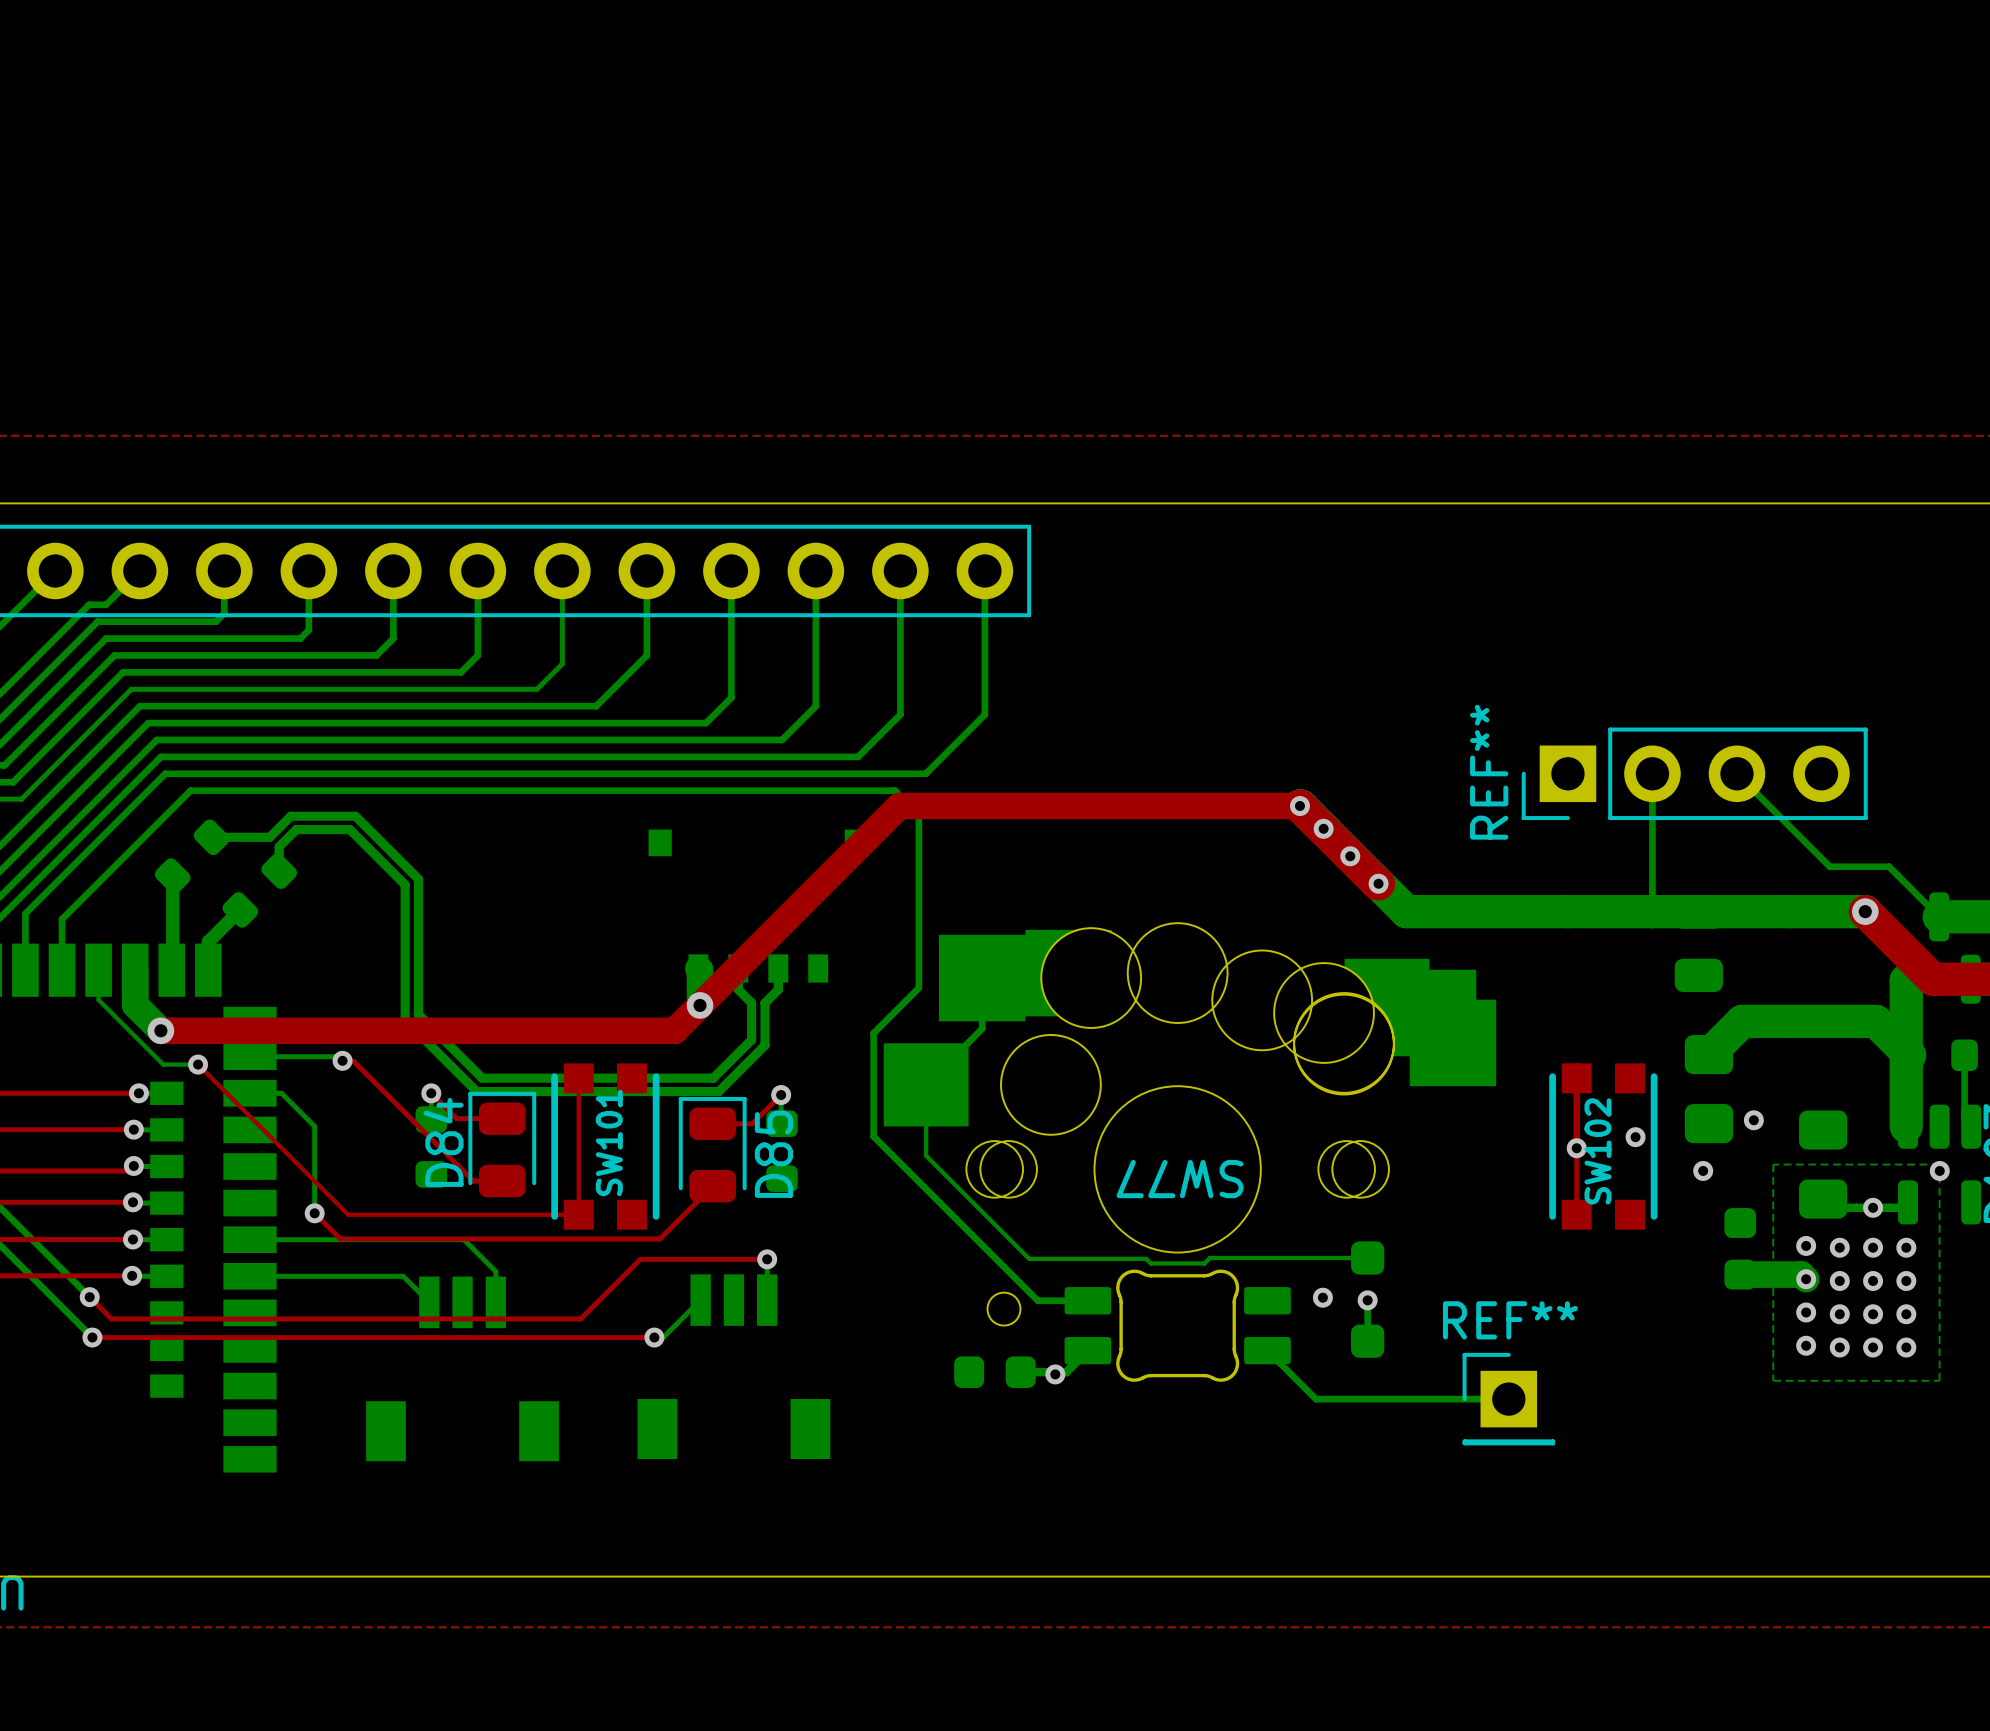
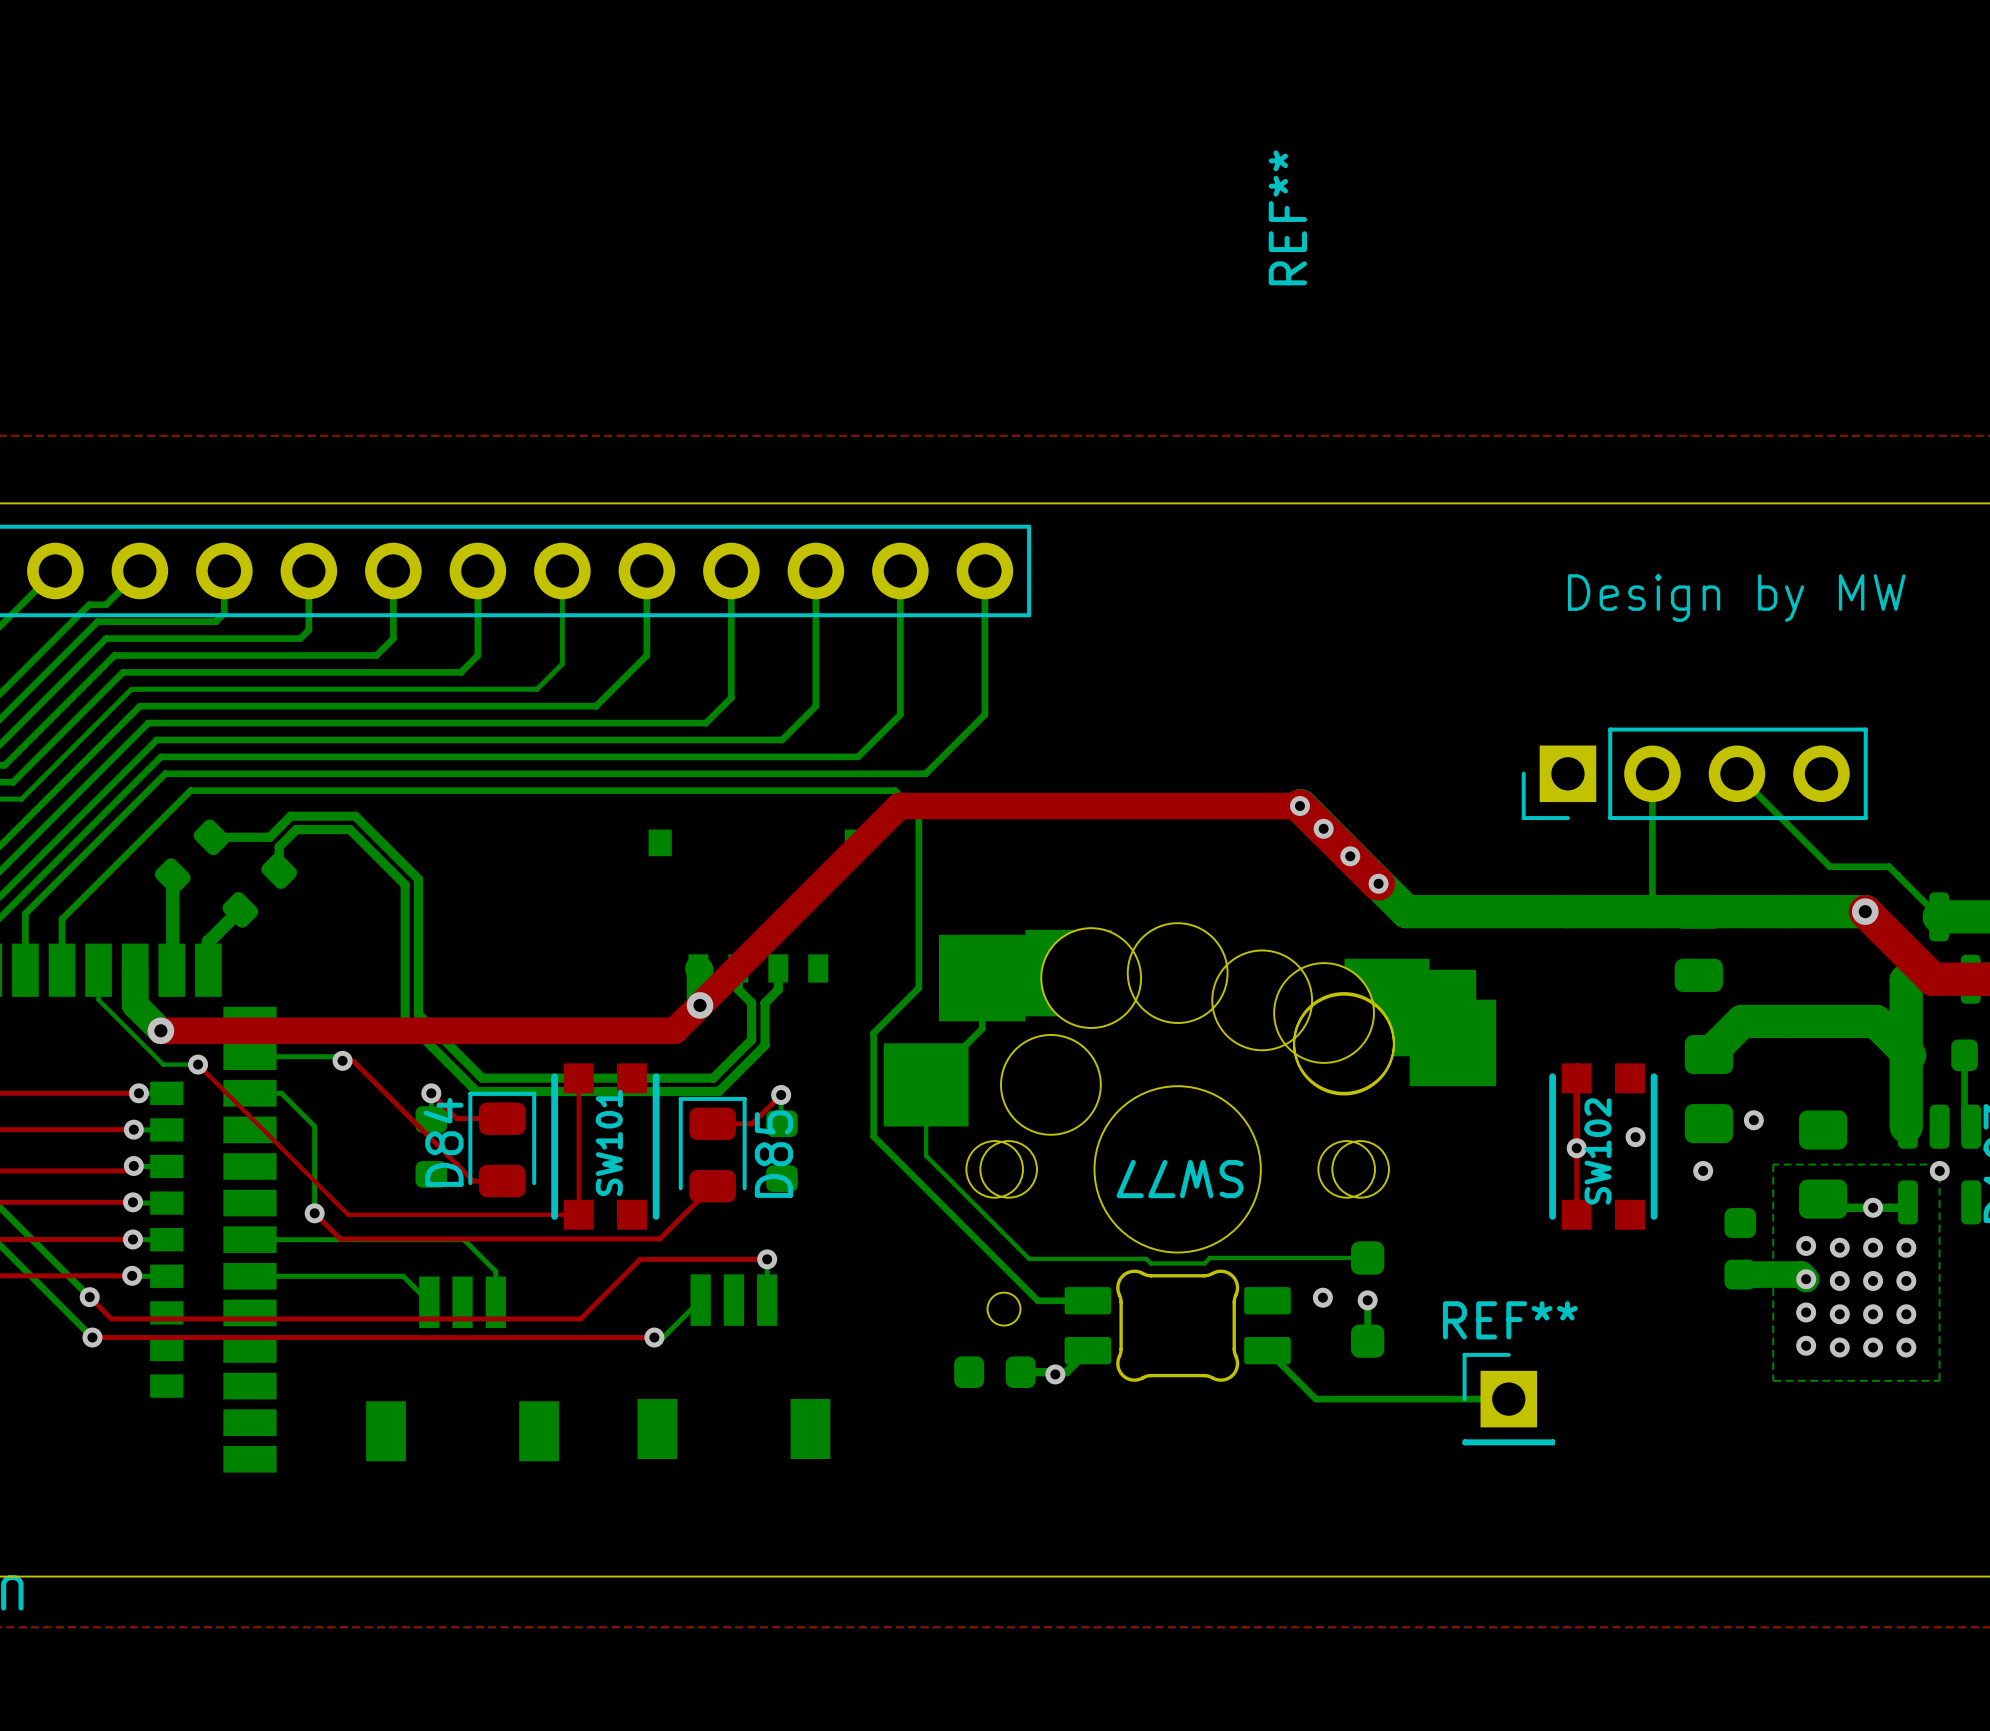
text: none -> Design by MW (1736, 598)
REF** name position: REF** (1489, 772) -> REF** (1287, 217)

